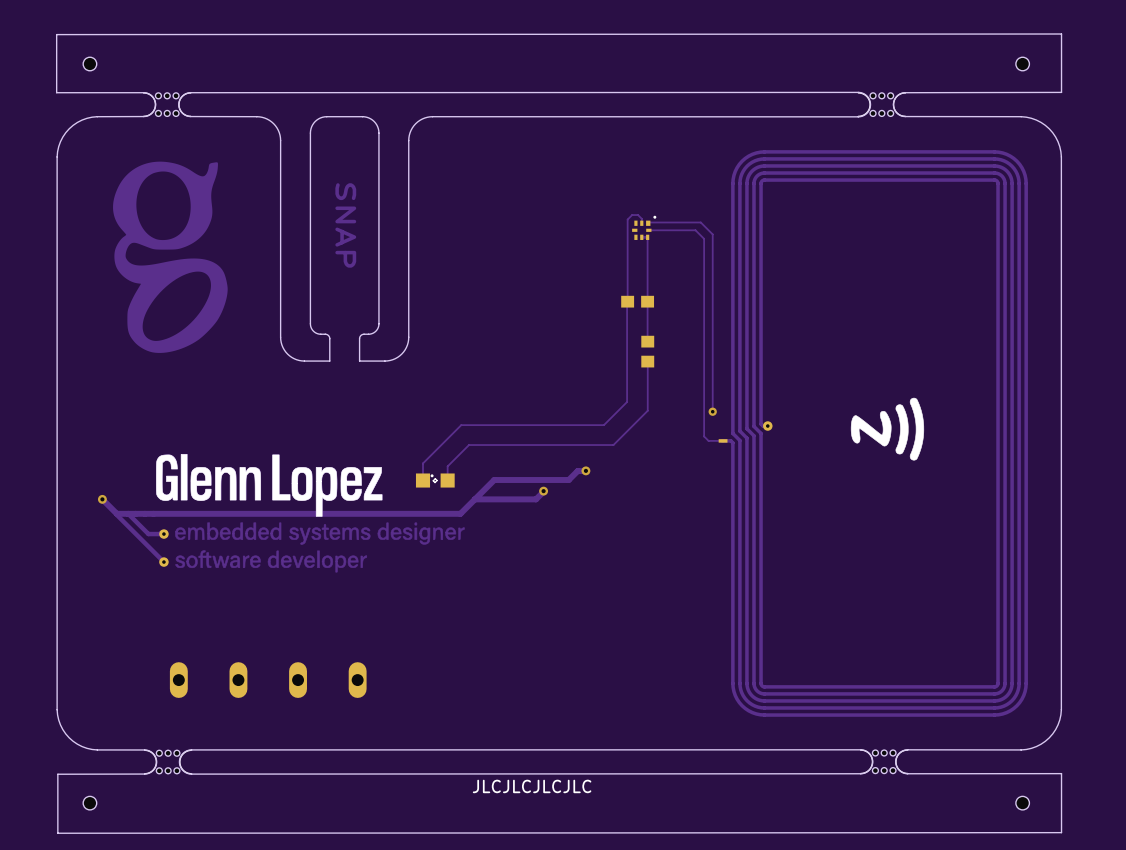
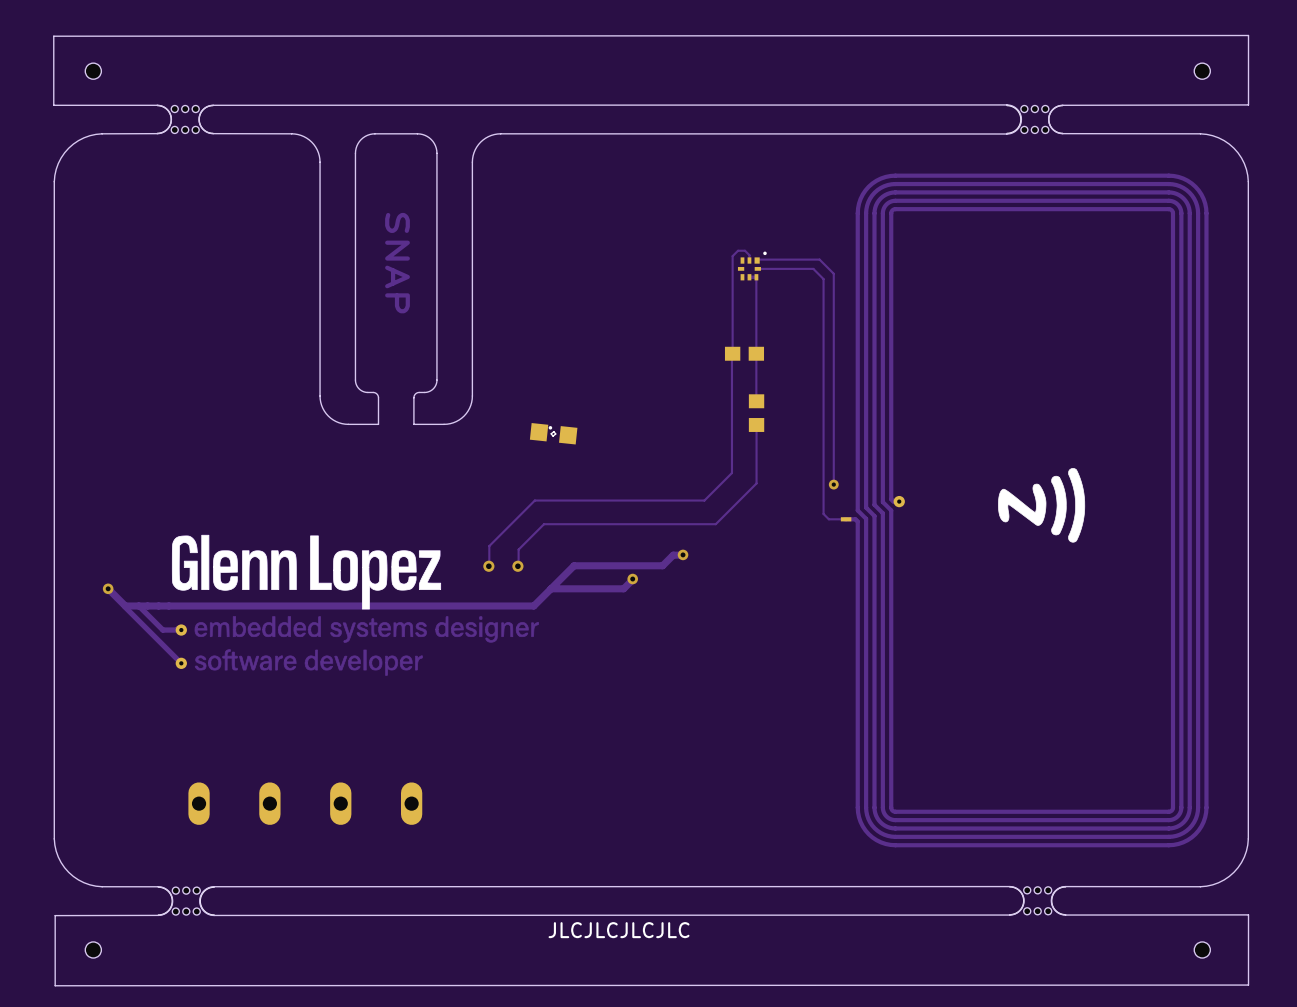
drawing: [113, 161, 228, 353] -> none
part: none -> (553, 433)
via: none -> (488, 566)
part: (435, 480) -> none
via: none -> (517, 566)

